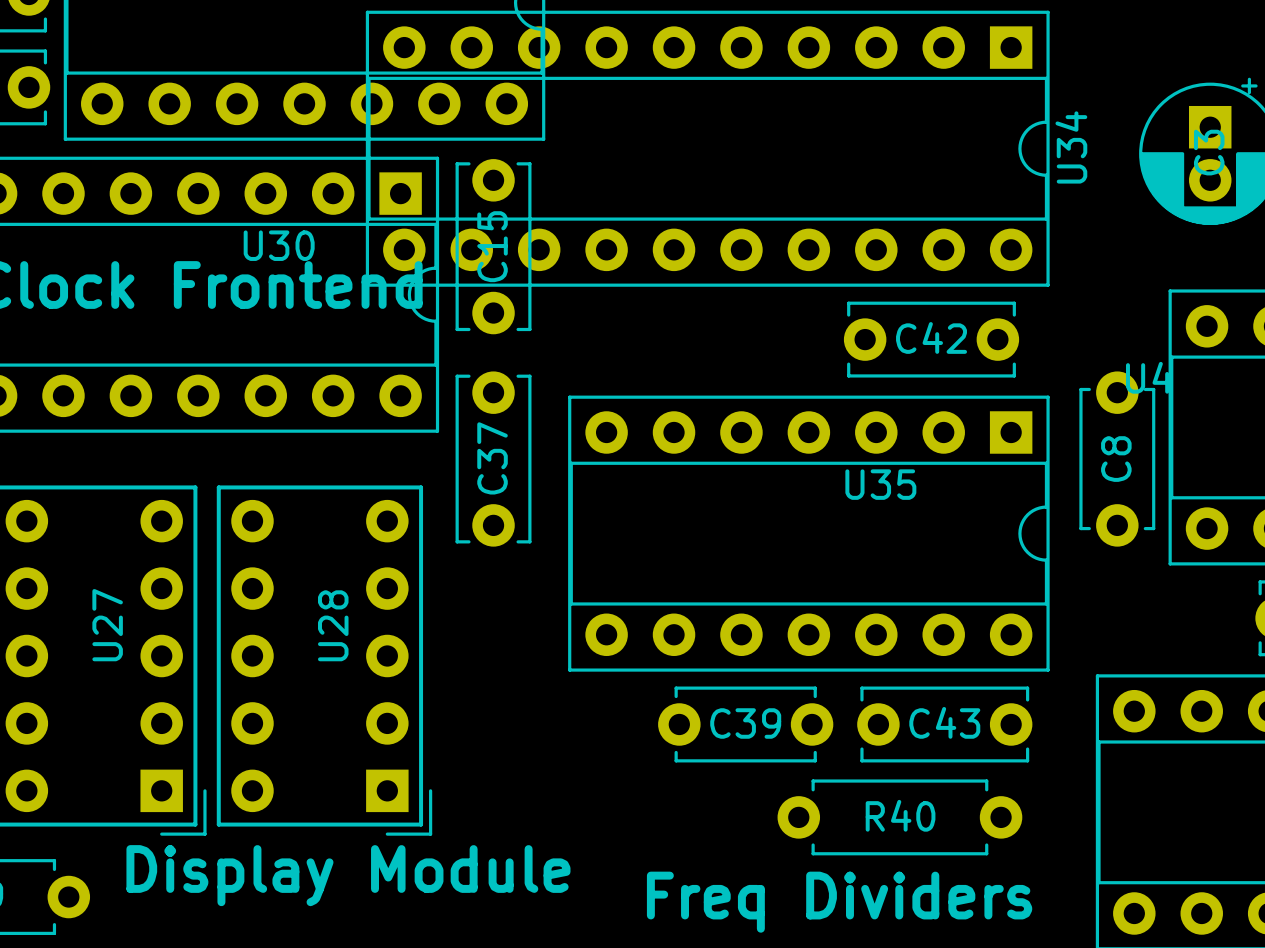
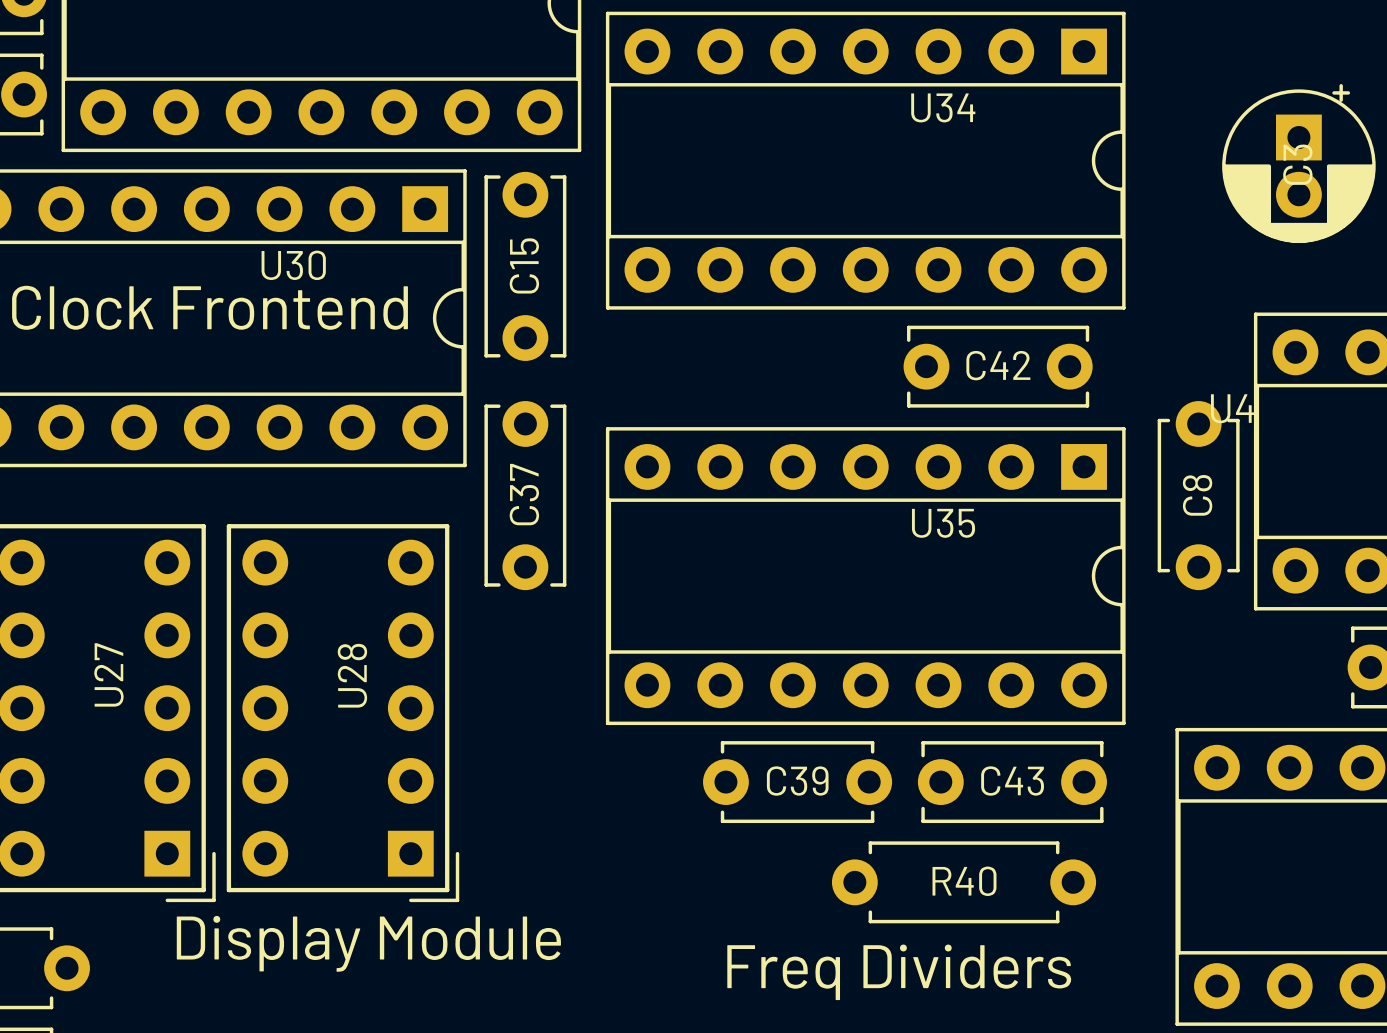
U34 footprint: [365, 10, 1050, 287] -> [605, 11, 1126, 310]
U34 name position: U34 (1071, 147) -> U34 (943, 107)

